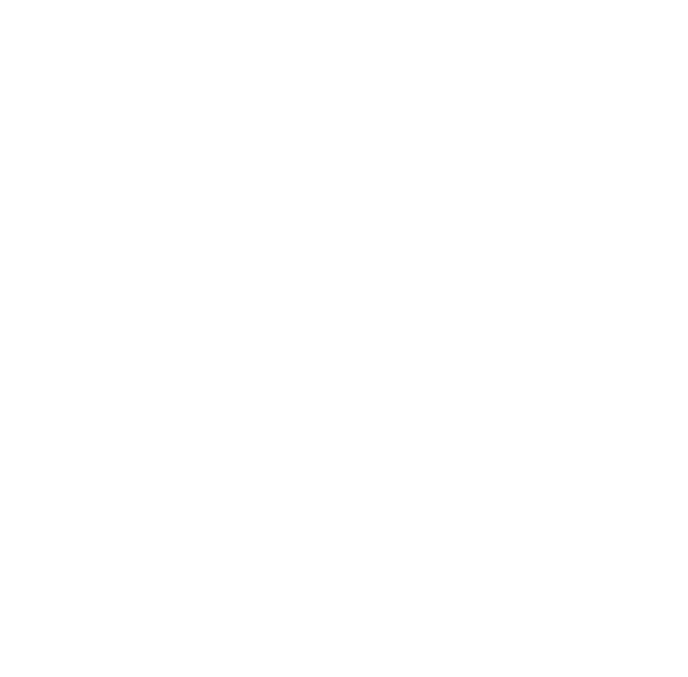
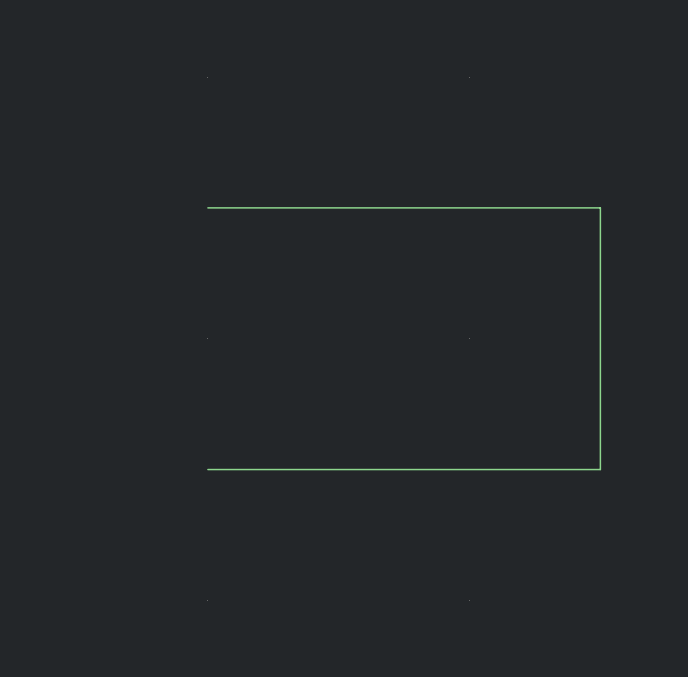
wire: none -> (207, 207) (600, 207) (600, 469) (207, 469)

